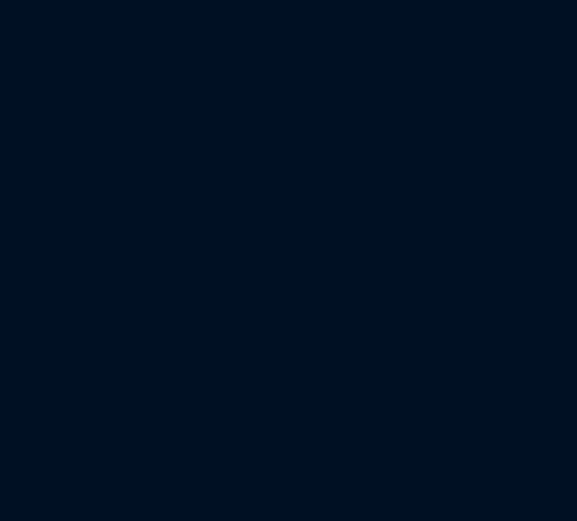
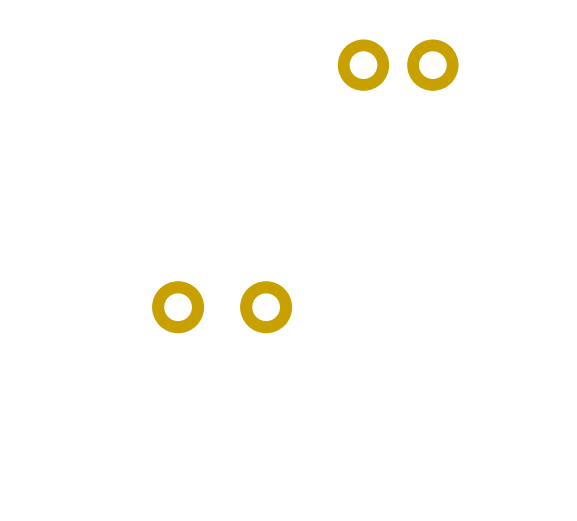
part: none -> (398, 65)
part: none -> (222, 307)

